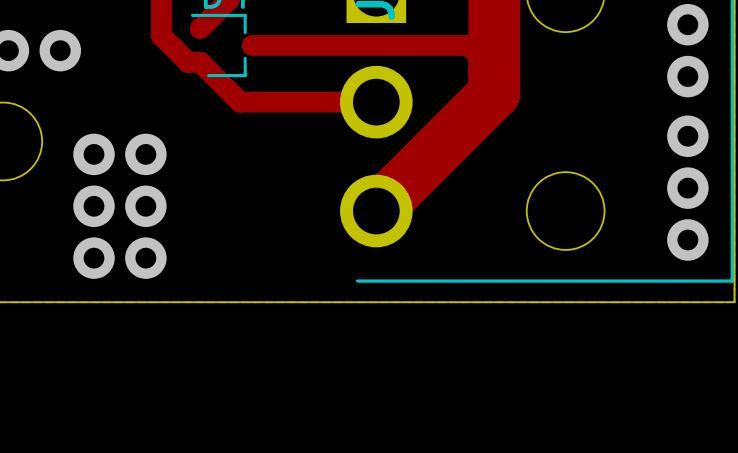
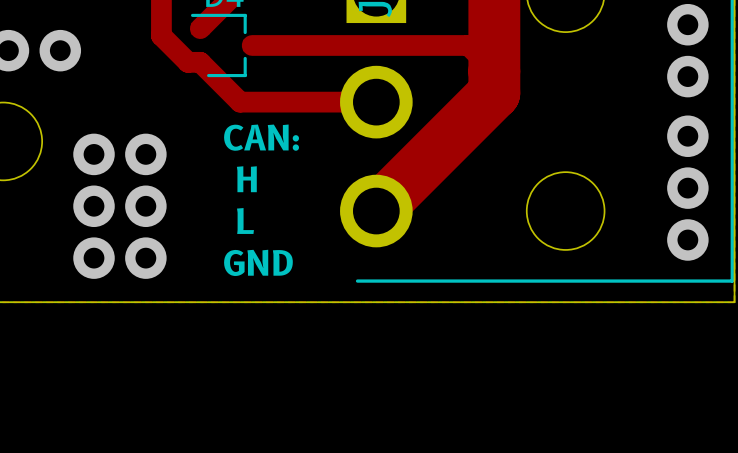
text: none -> CAN: (261, 137)
text: none -> H (246, 179)
text: none -> L (245, 221)
text: none -> GND (258, 262)

